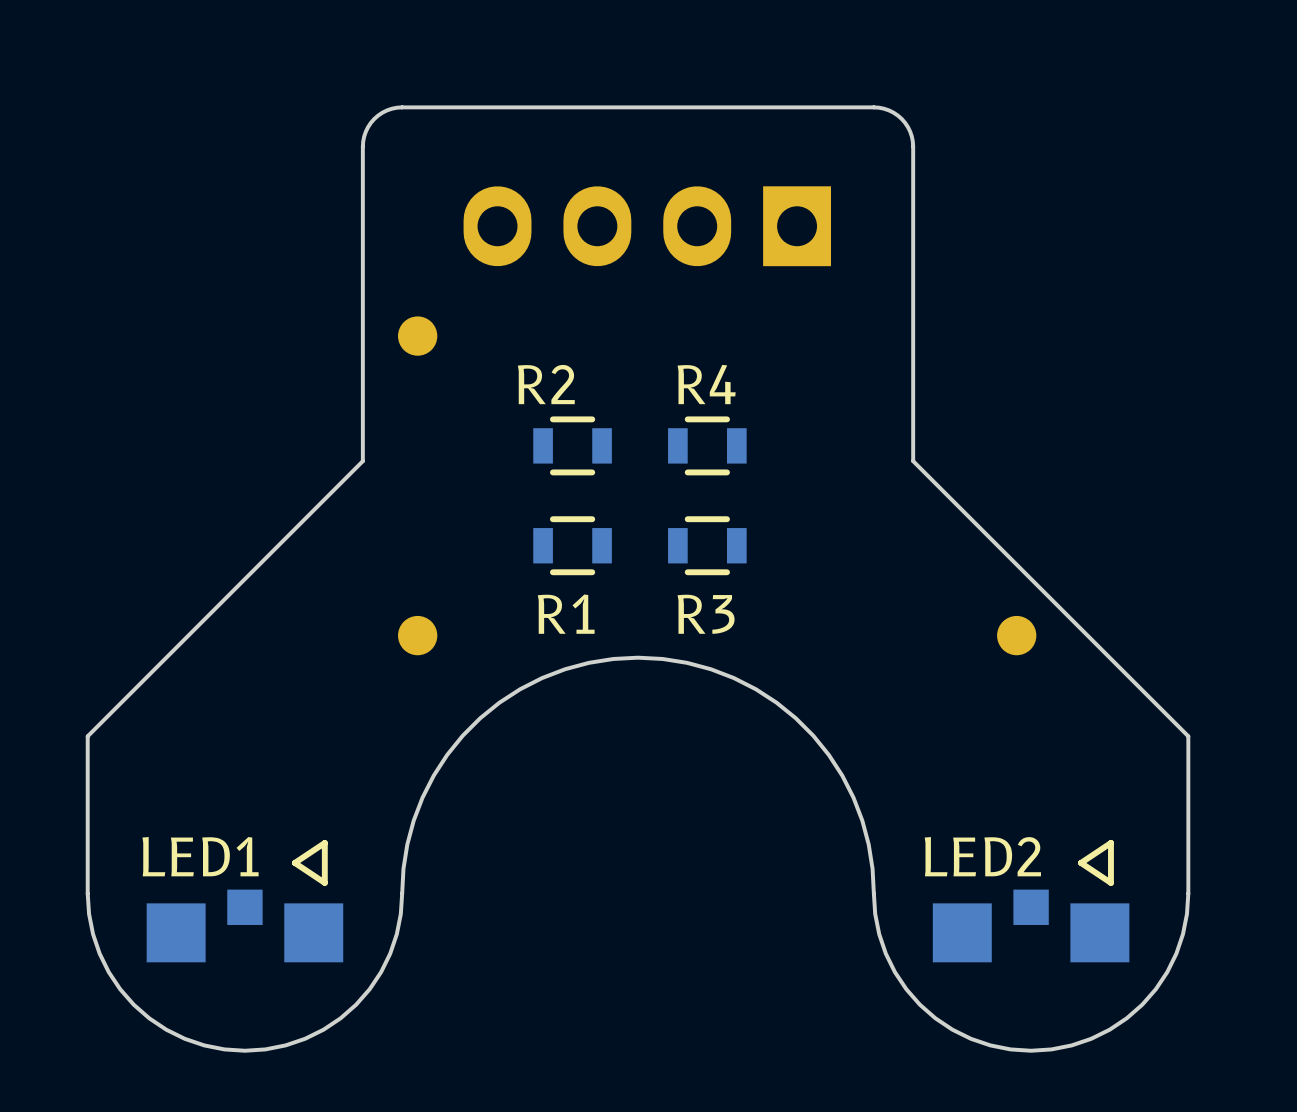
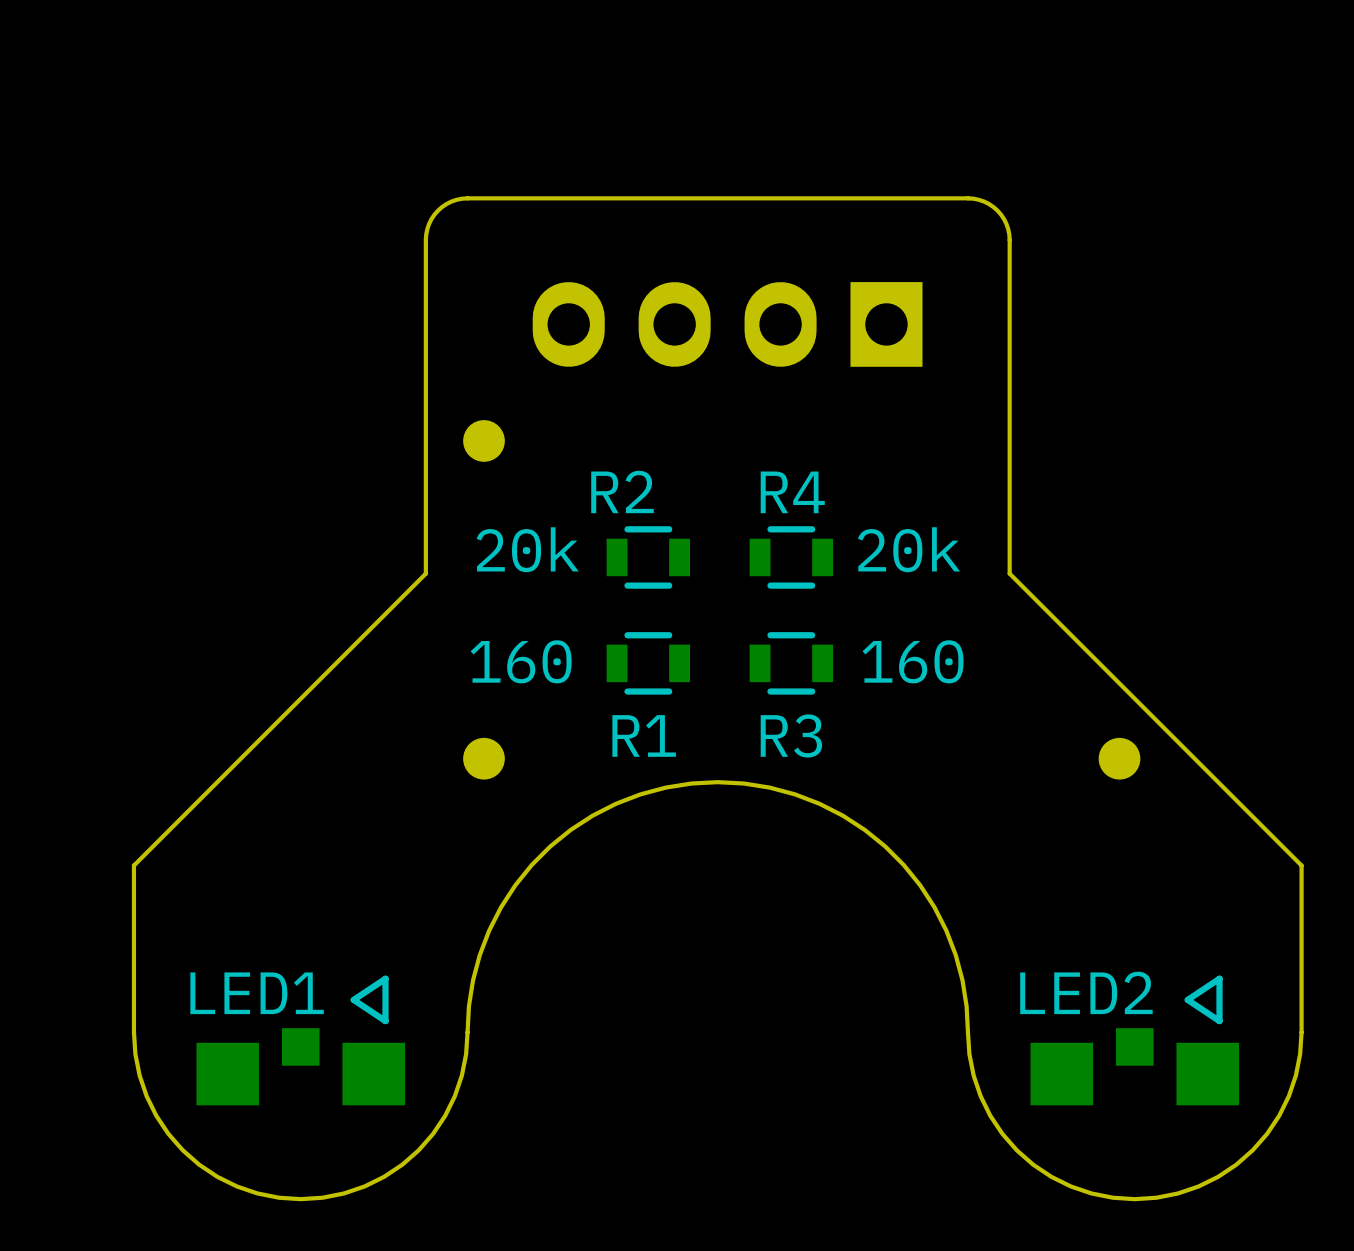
R2 value: none -> 20k (527, 549)
R4 value: none -> 20k (909, 549)
R1 value: none -> 160 (521, 661)
R3 value: none -> 160 (913, 661)

